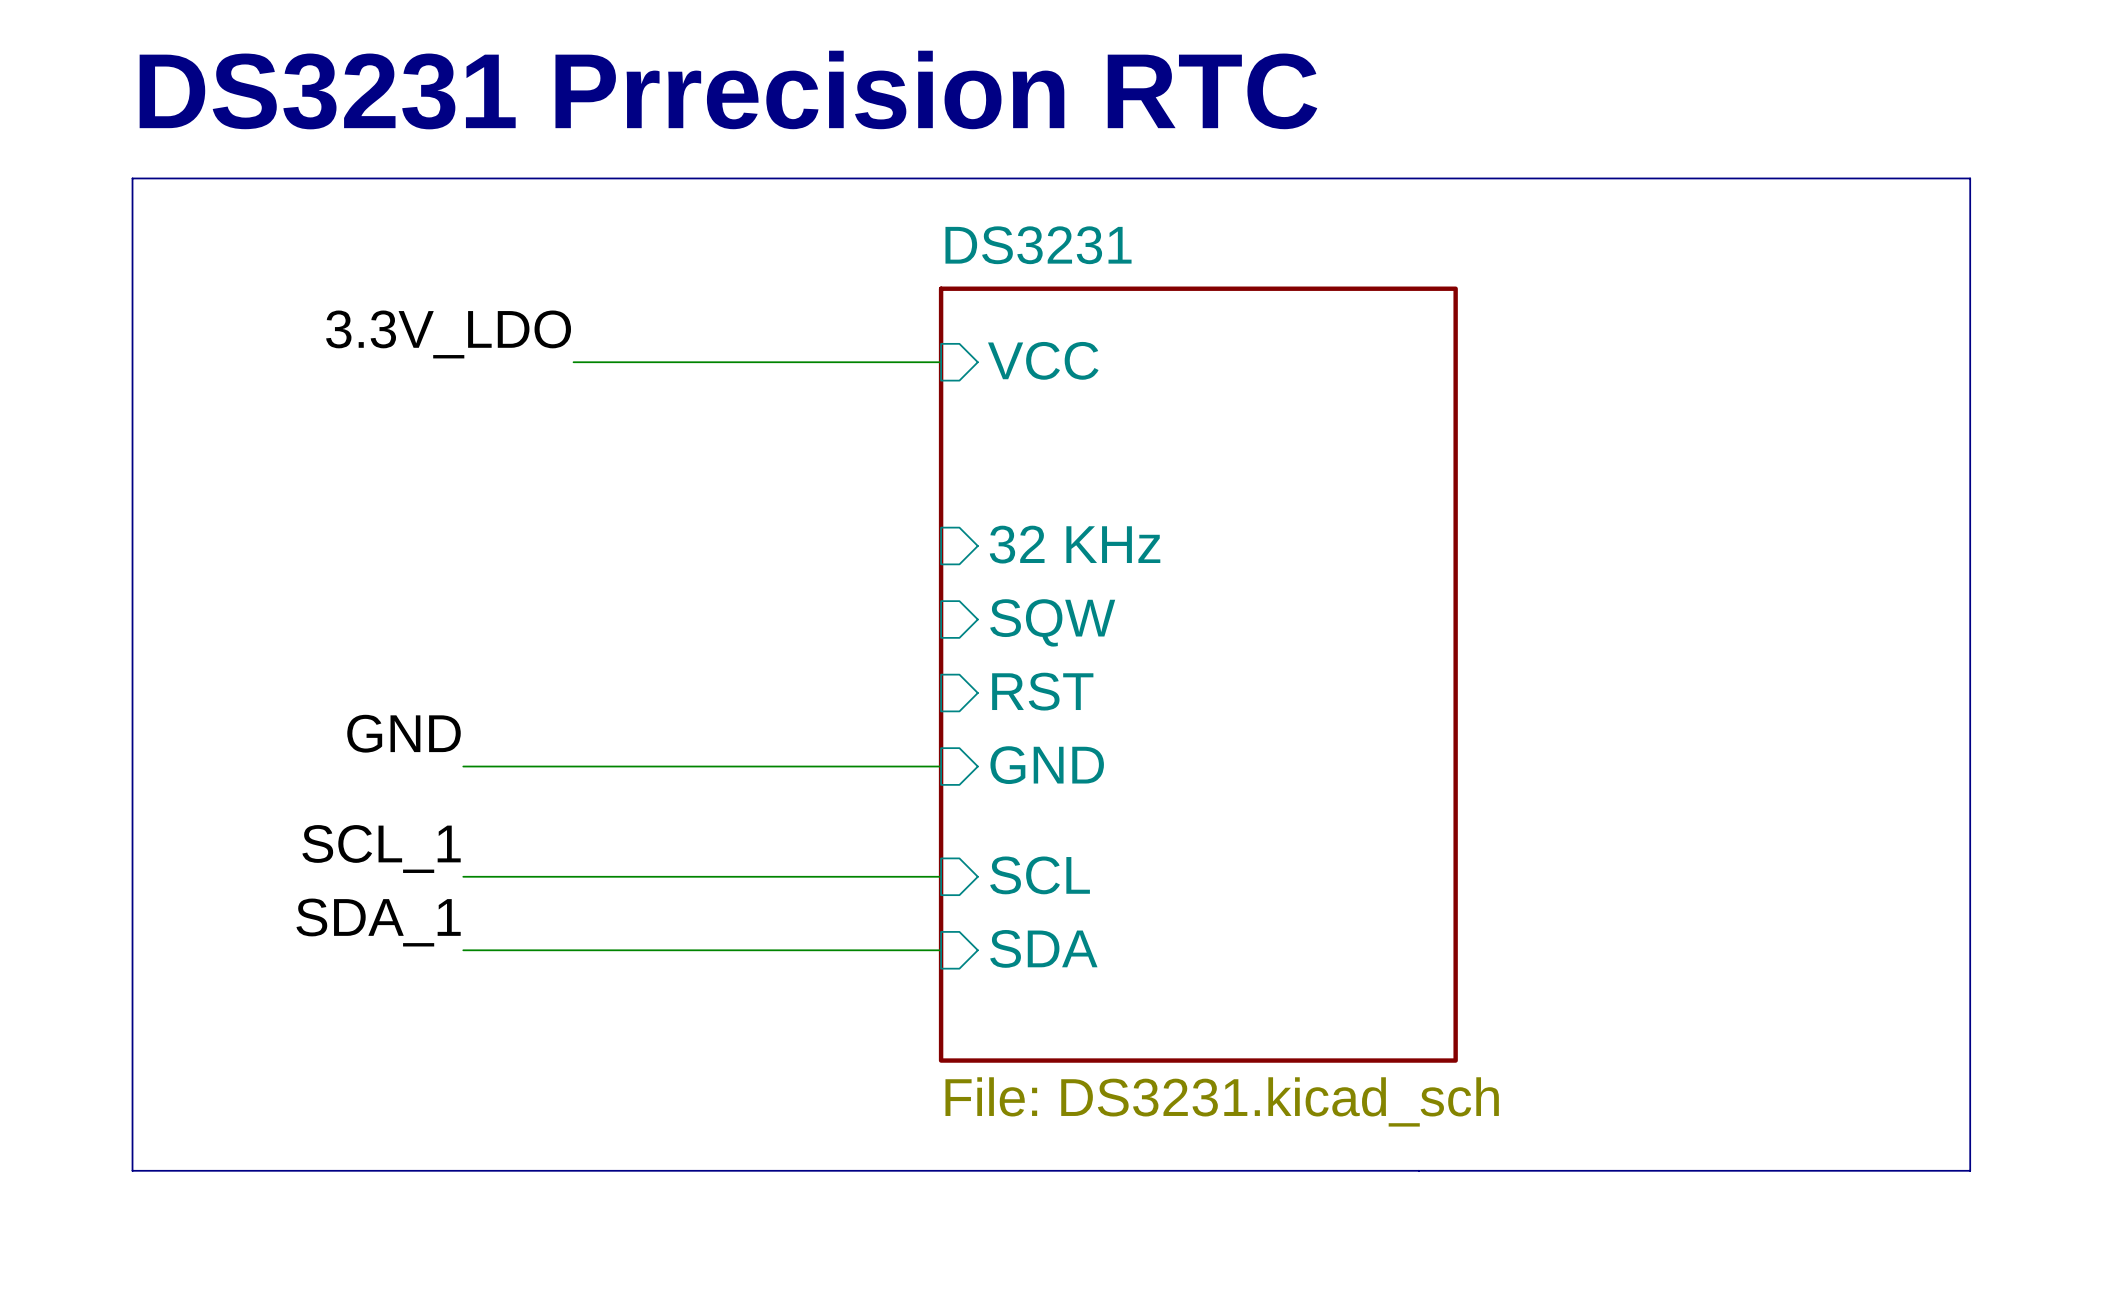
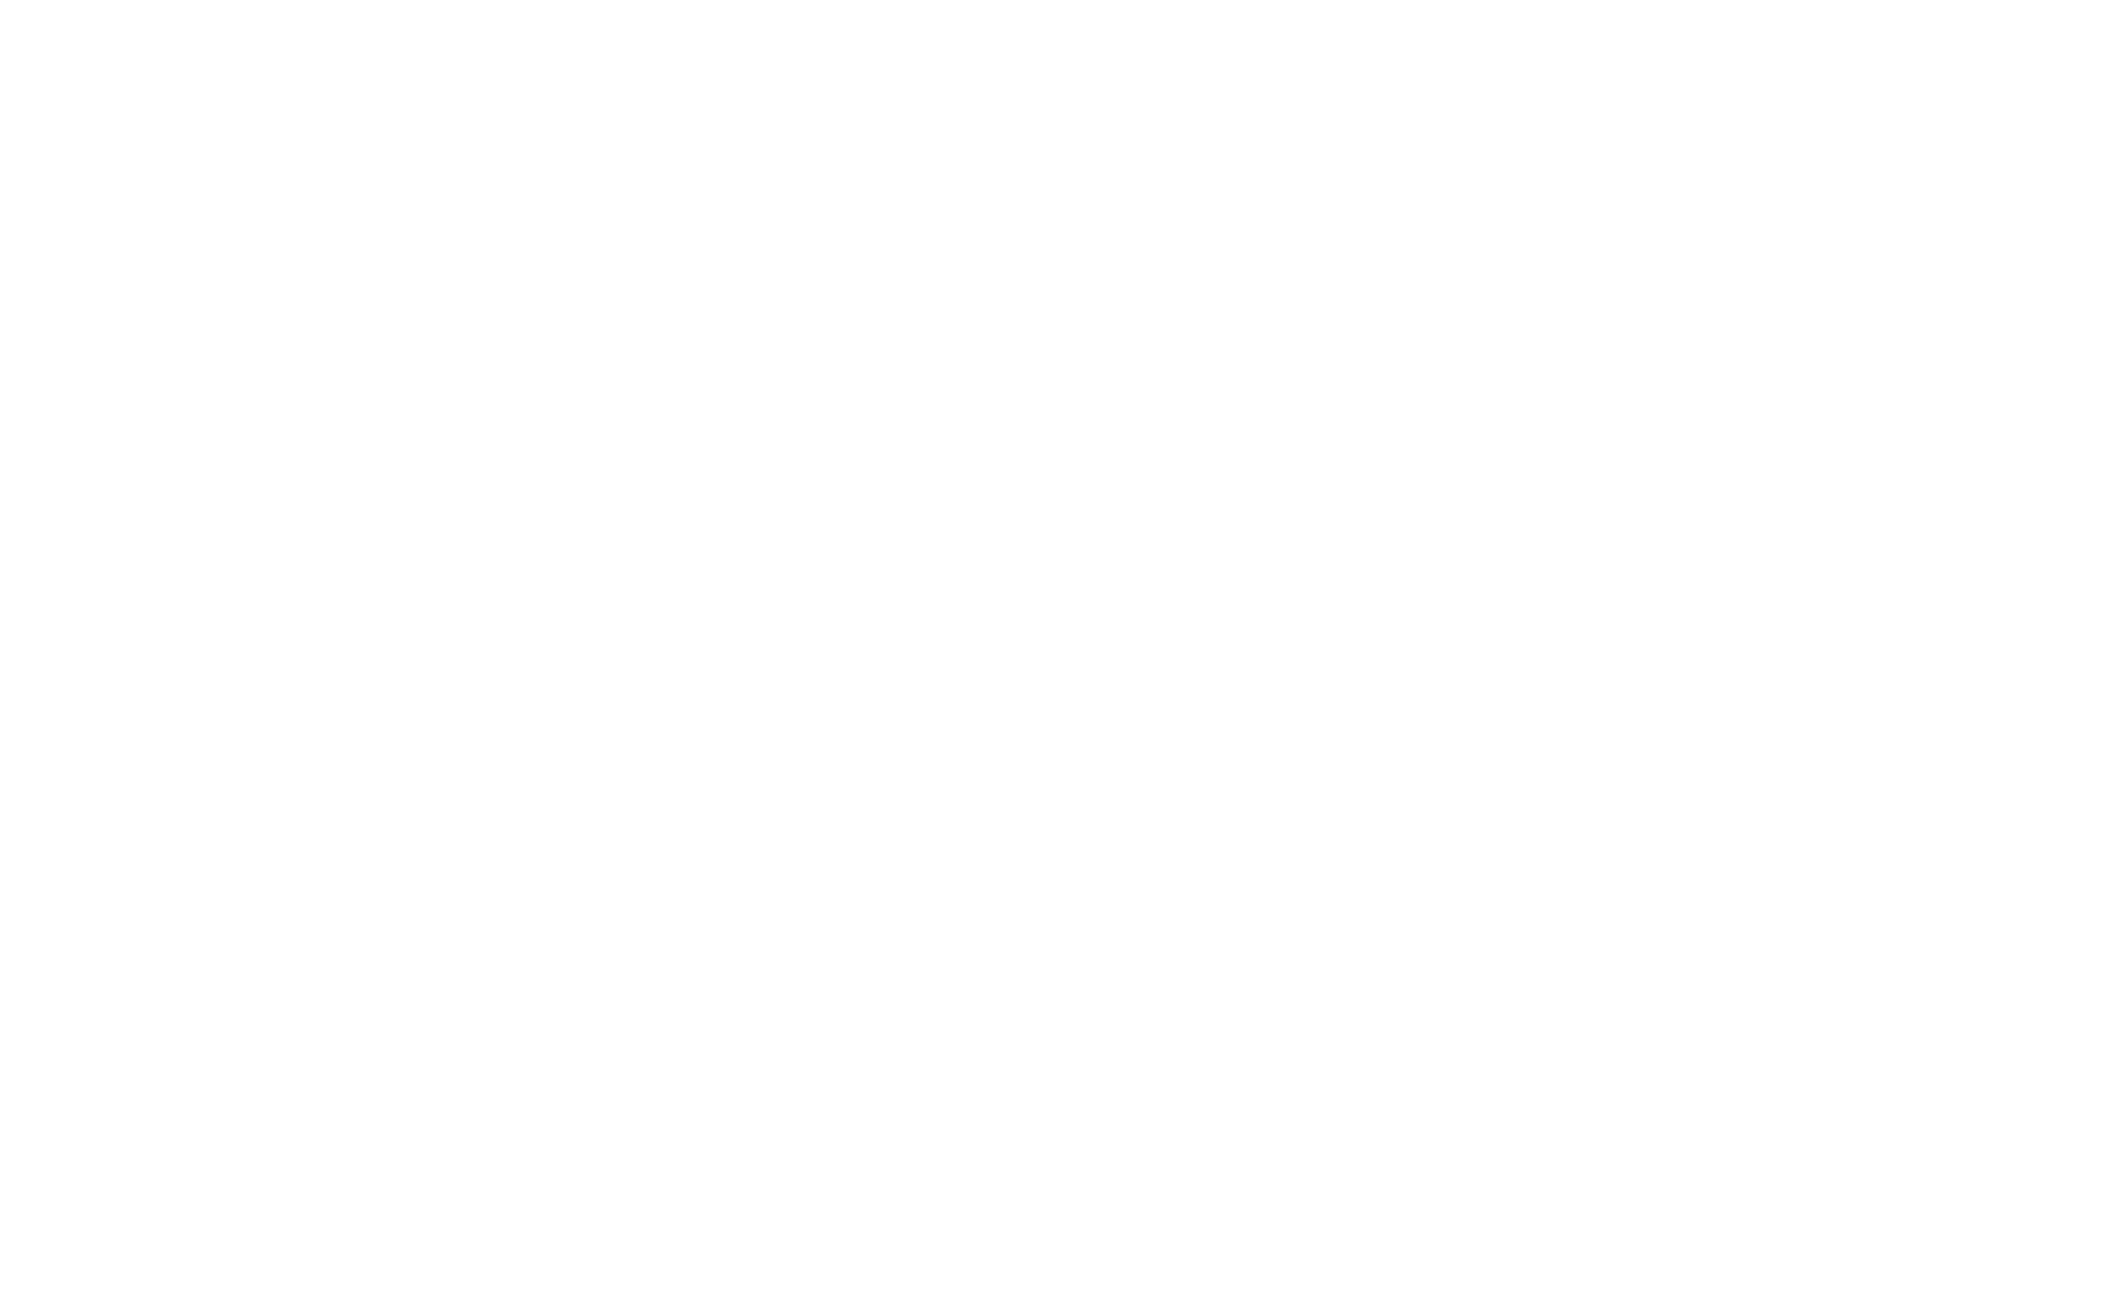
text: DS3231 Prrecision RTC (728, 90) -> none
line: (132, 178) (132, 1170) (1970, 1170) (1970, 178) (132, 178) -> none
label: 3.3V_LDO (448, 334) -> none
sheet pin: VCC (1043, 360) -> none
wire: (573, 362) (941, 362) -> none
sheet pin: 32 KHz (1075, 544) -> none
sheet pin: SQW (1052, 622) -> none
sheet DS3231: File: DS3231.kicad_sch (1198, 674) -> none
sheet pin: RST (1042, 691) -> none
label: GND (404, 733) -> none
sheet pin: GND (1047, 765) -> none
wire: (463, 766) (941, 766) -> none
label: SCL_1 (381, 849) -> none
sheet pin: SCL (1040, 875) -> none
wire: (463, 876) (941, 876) -> none
label: SDA_1 (378, 922) -> none
sheet pin: SDA (1043, 948) -> none
wire: (463, 950) (941, 950) -> none

